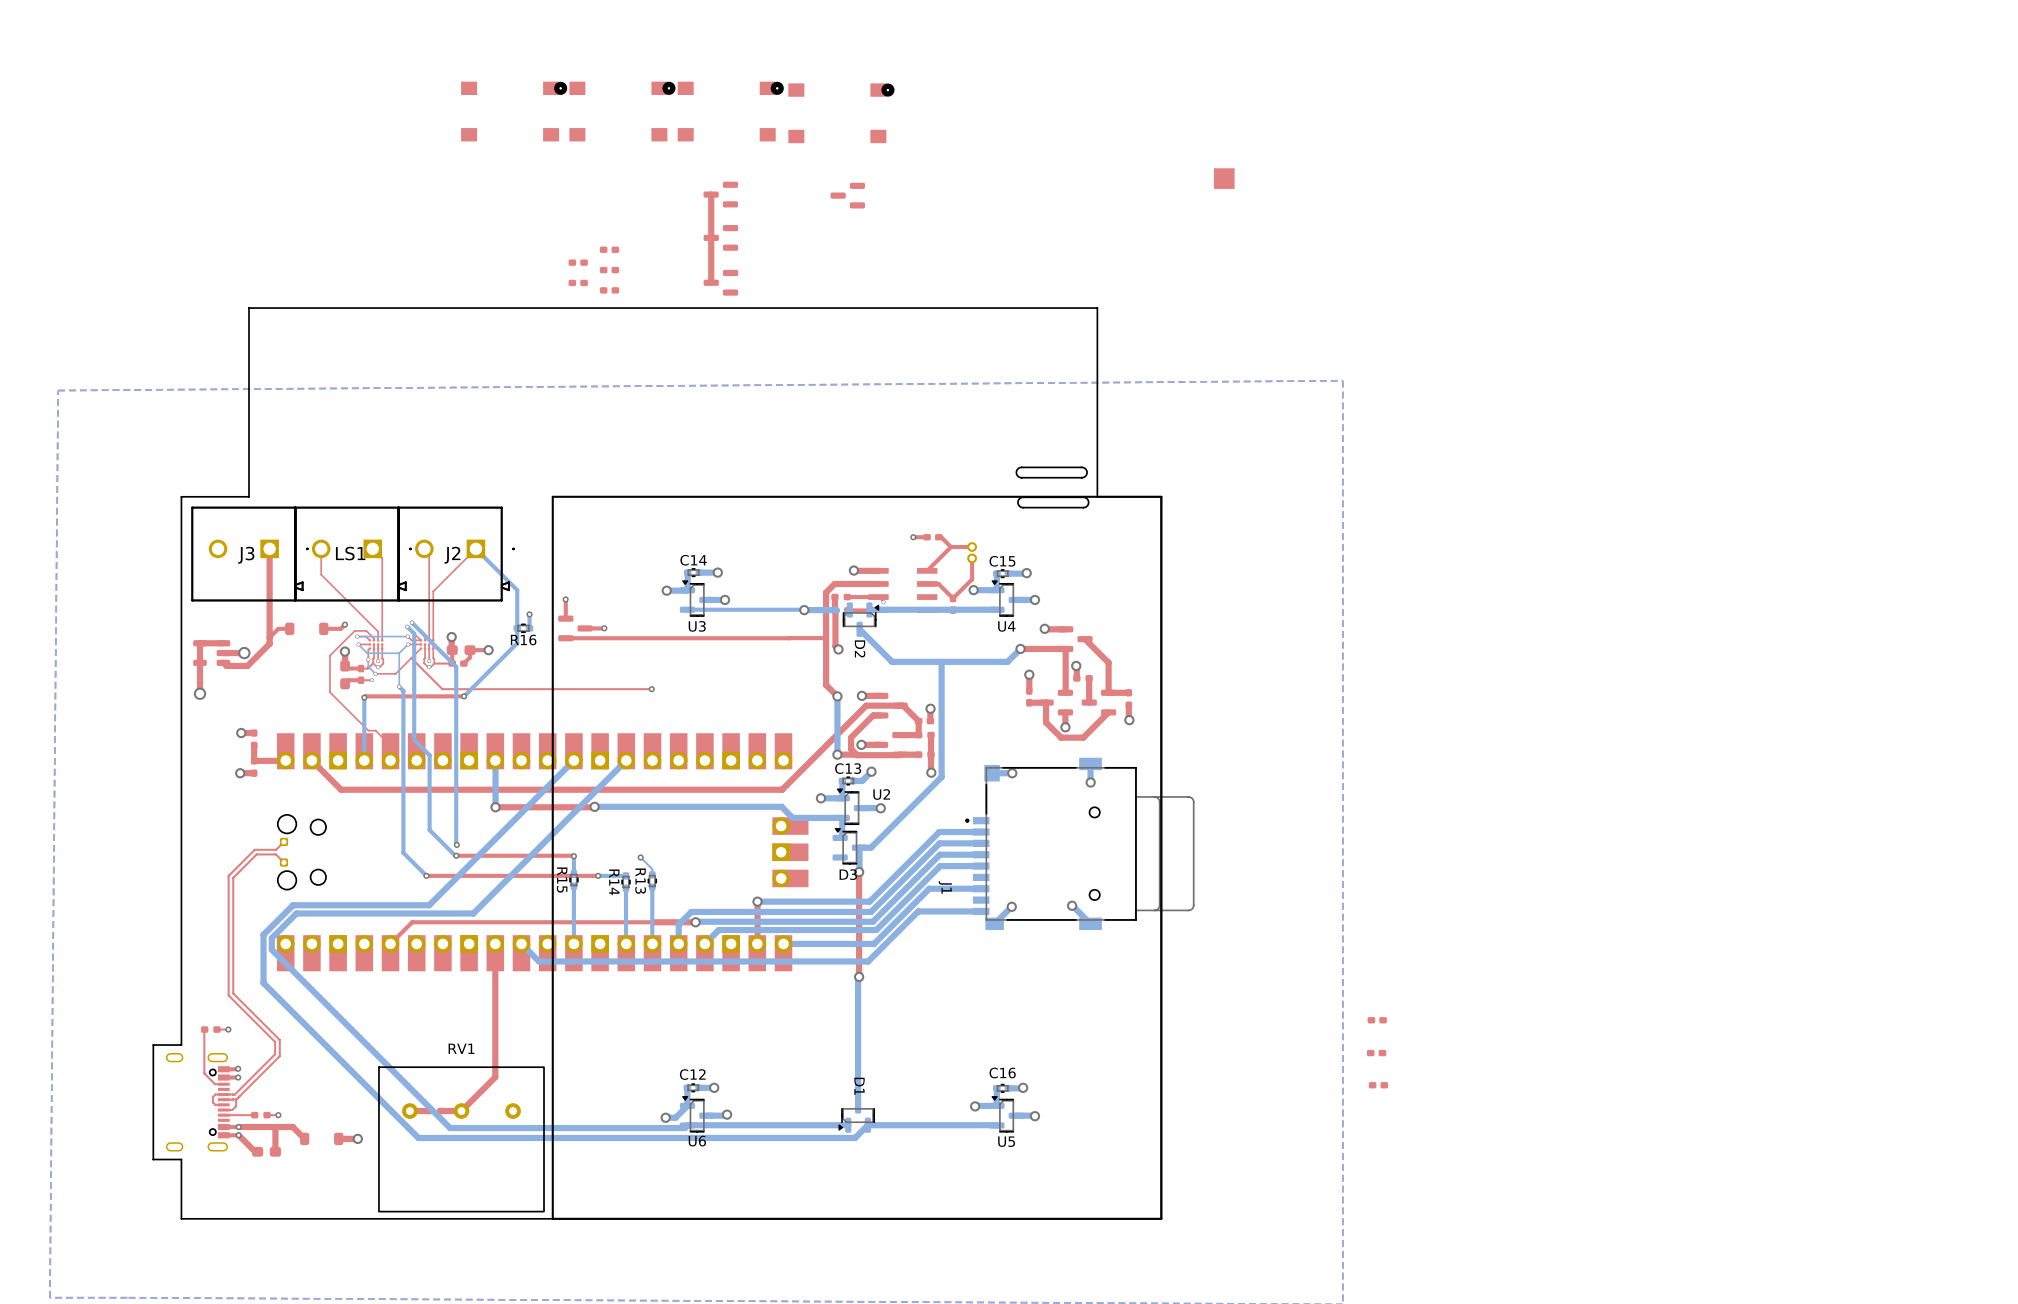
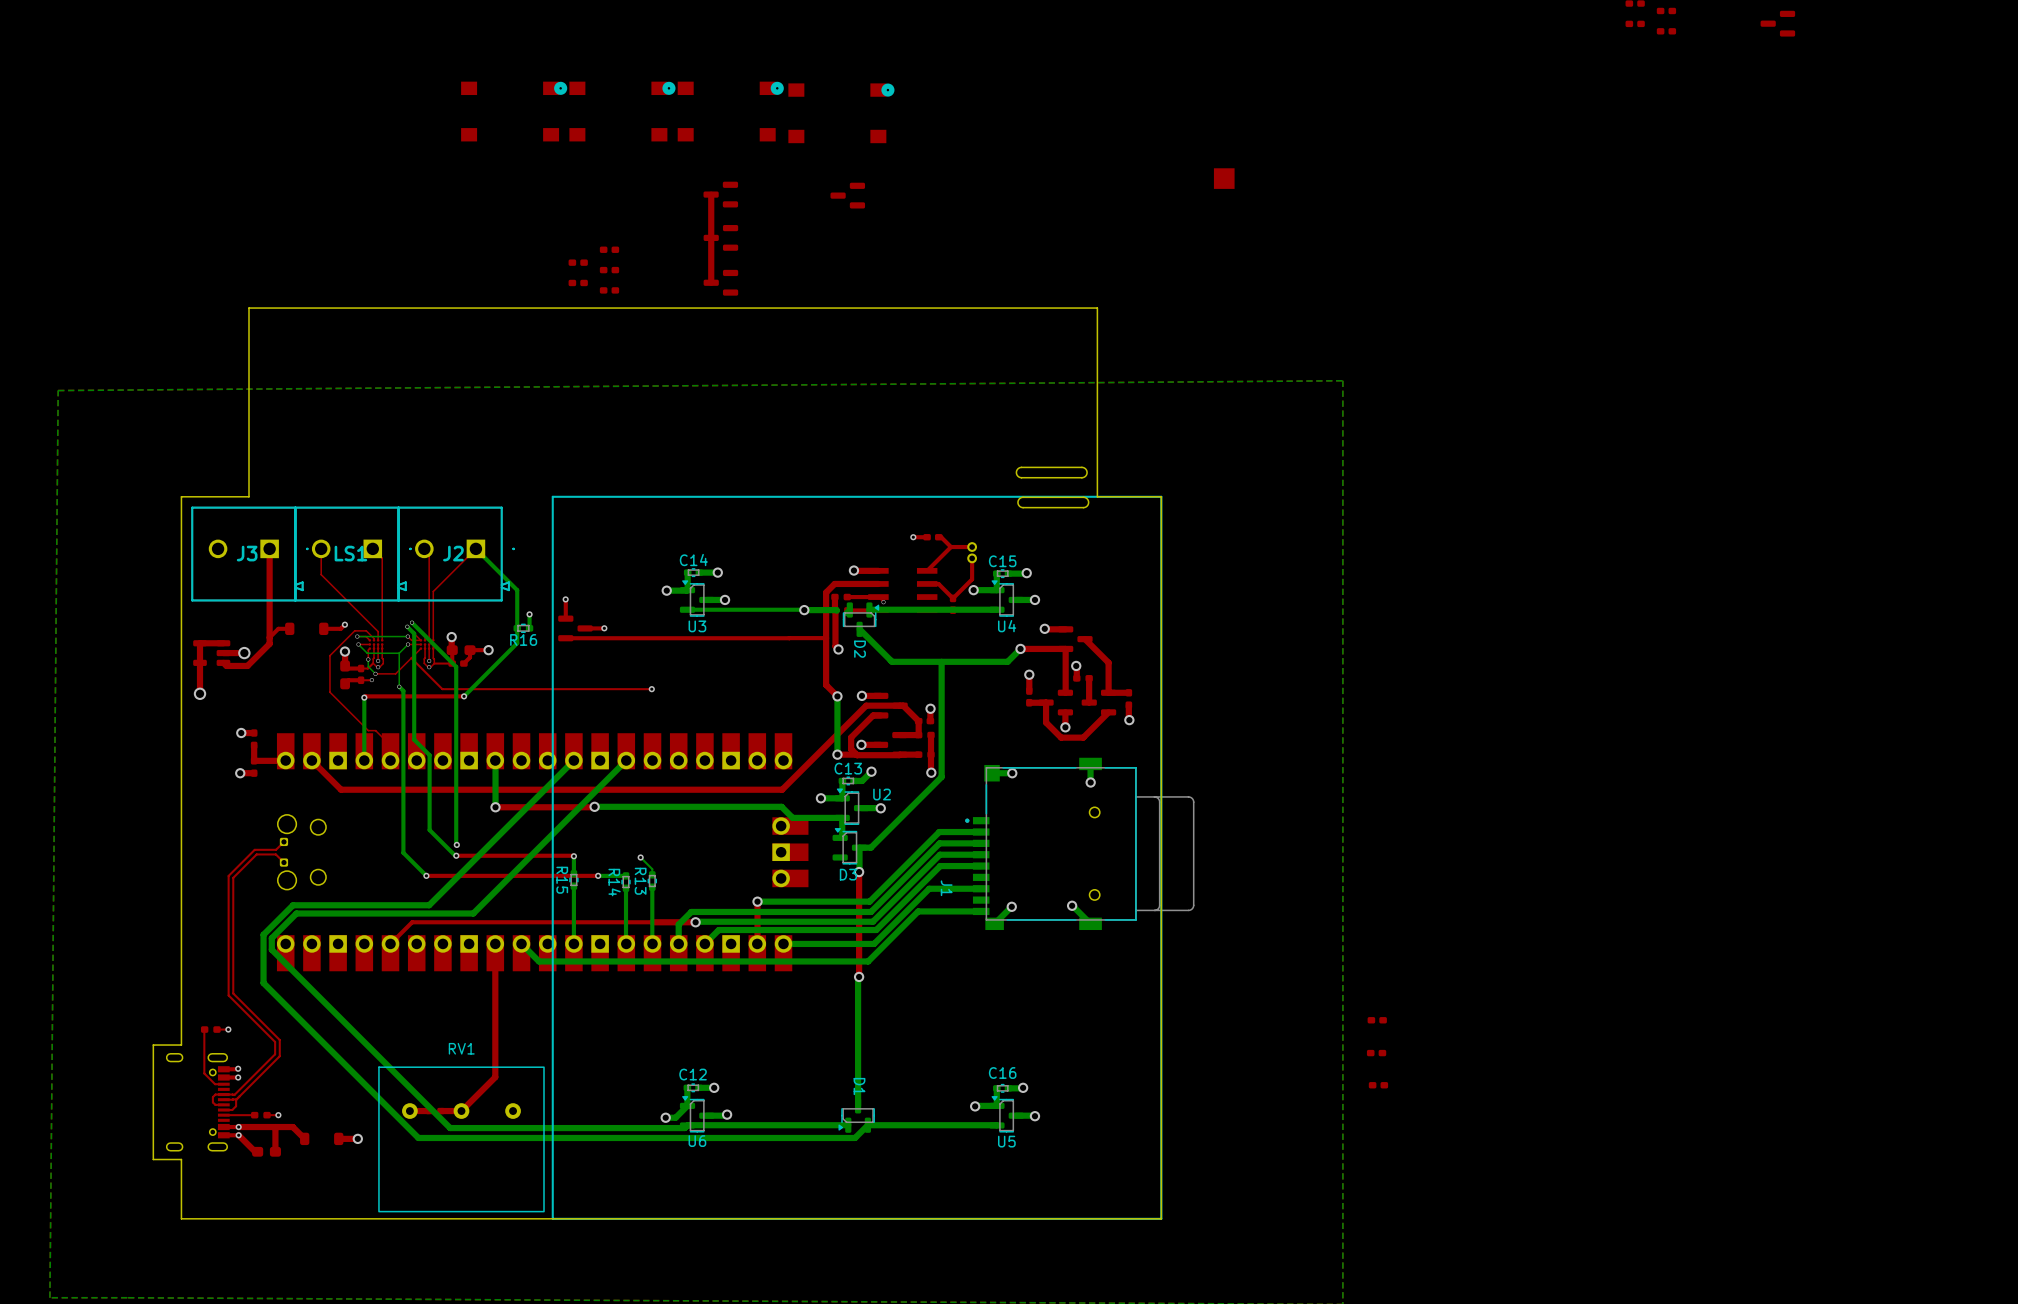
part: none -> (1635, 3)
part: none -> (1666, 10)
part: none -> (1635, 23)
part: none -> (1777, 23)
part: none -> (1666, 31)

